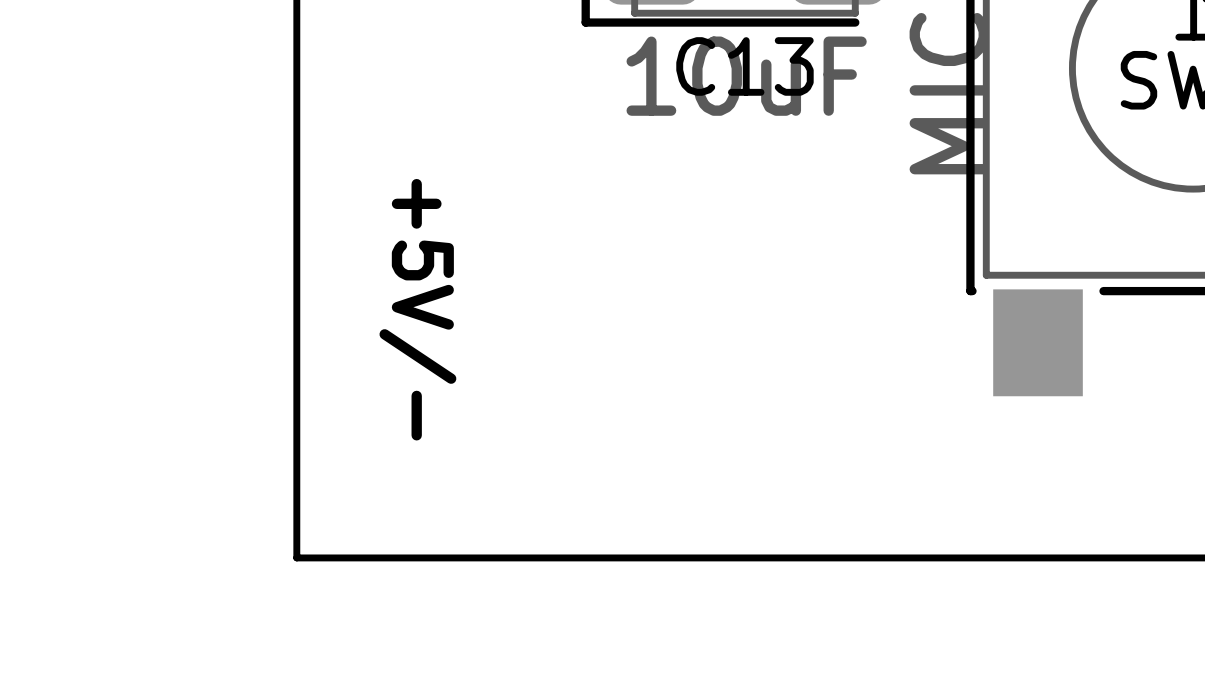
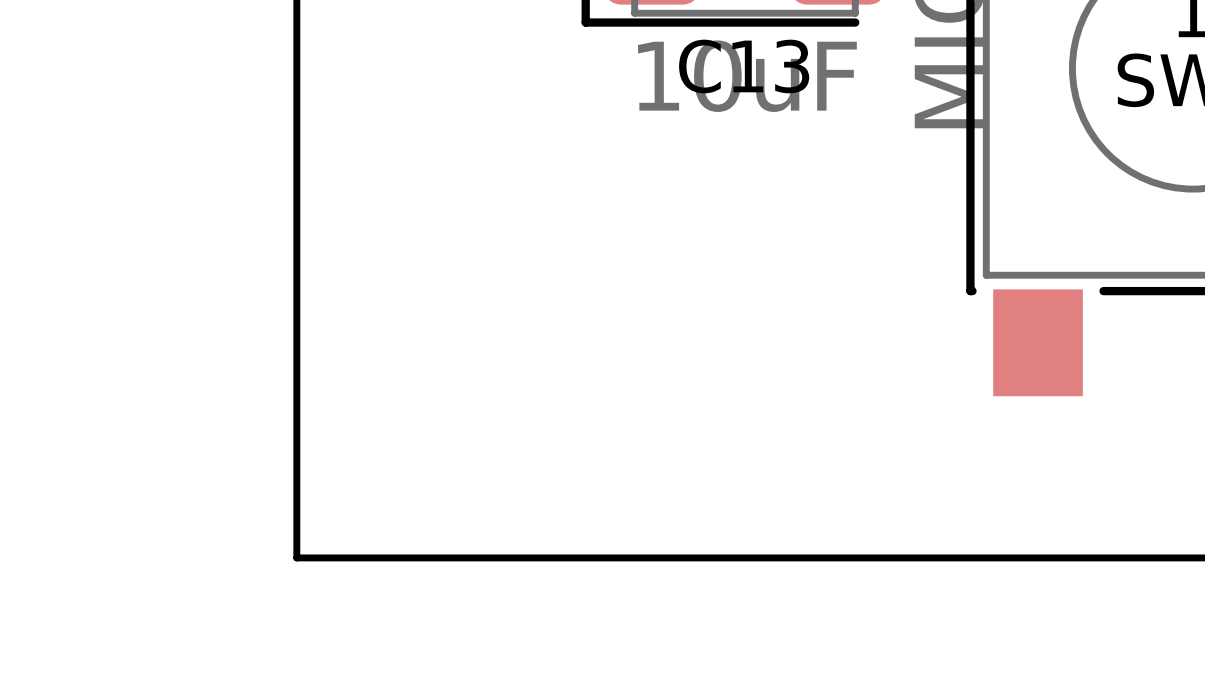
text: +5V/- (417, 309) -> none

